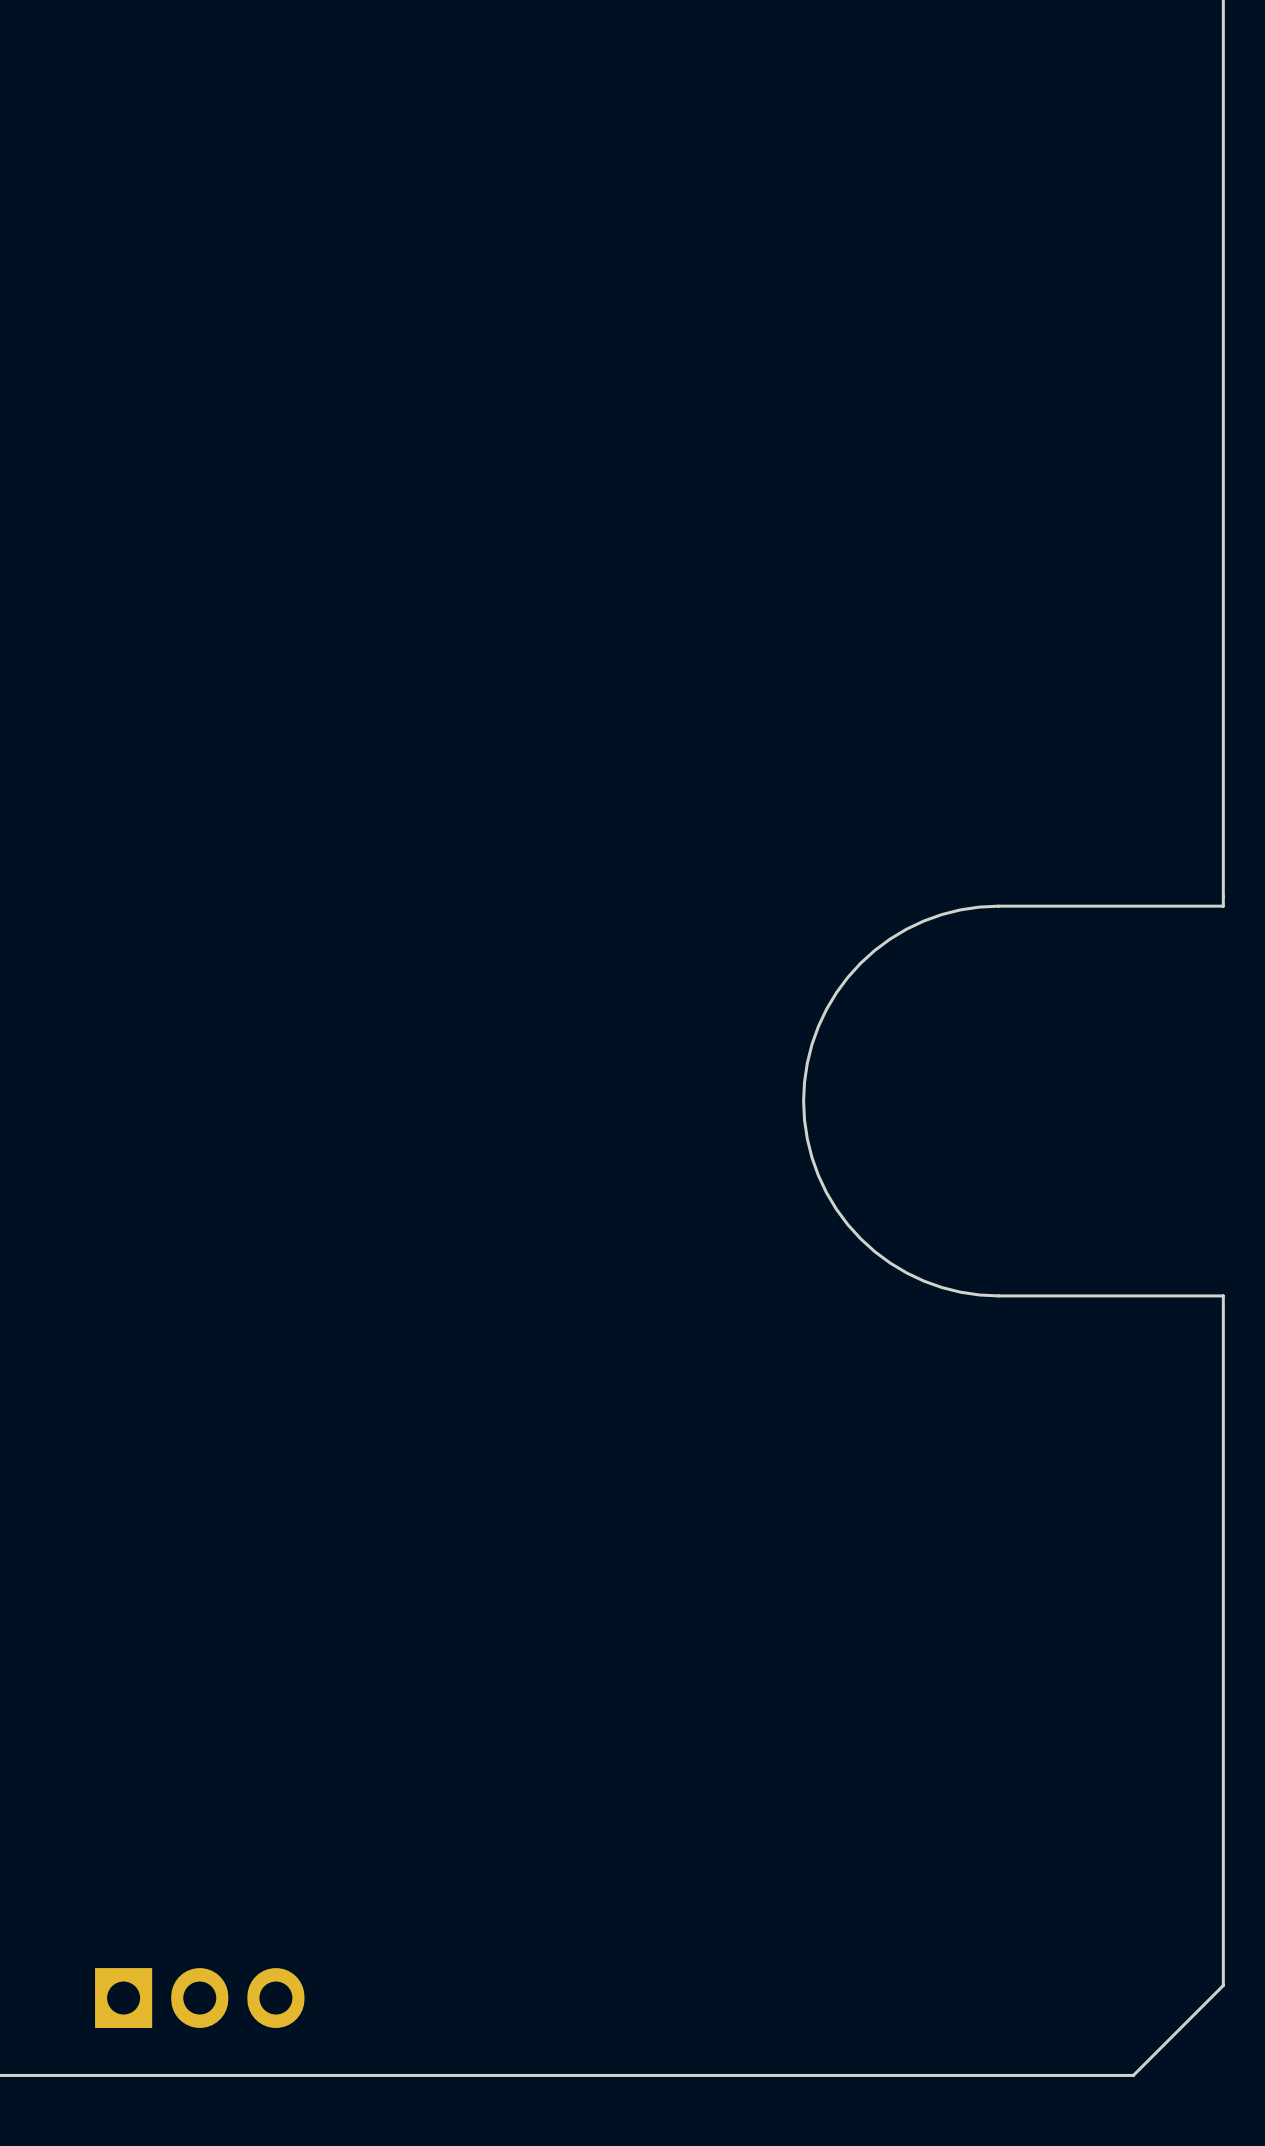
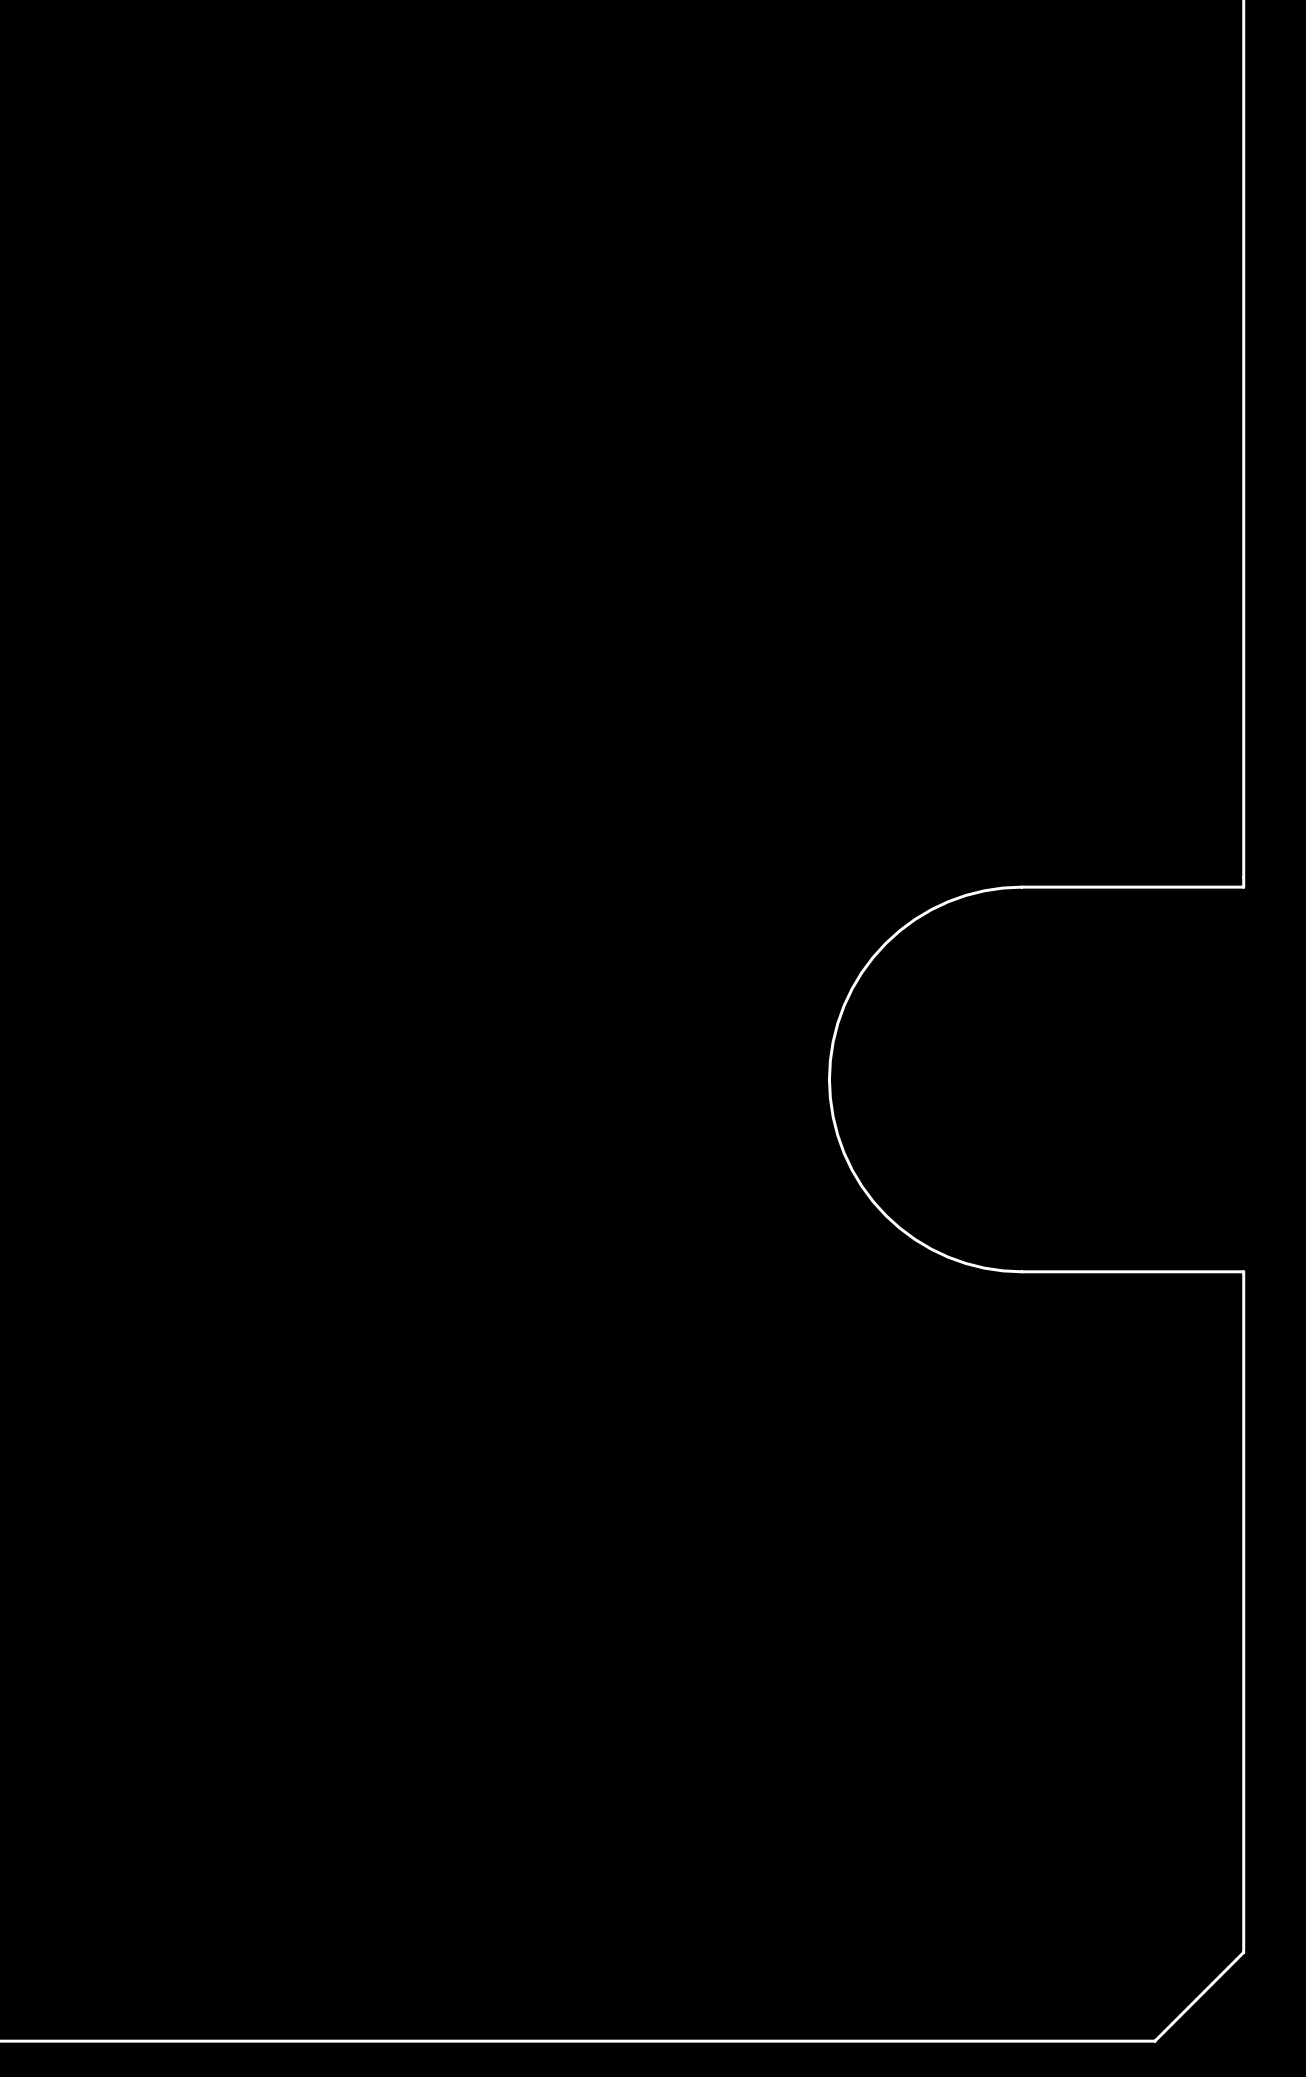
part: (199, 1998) -> none

